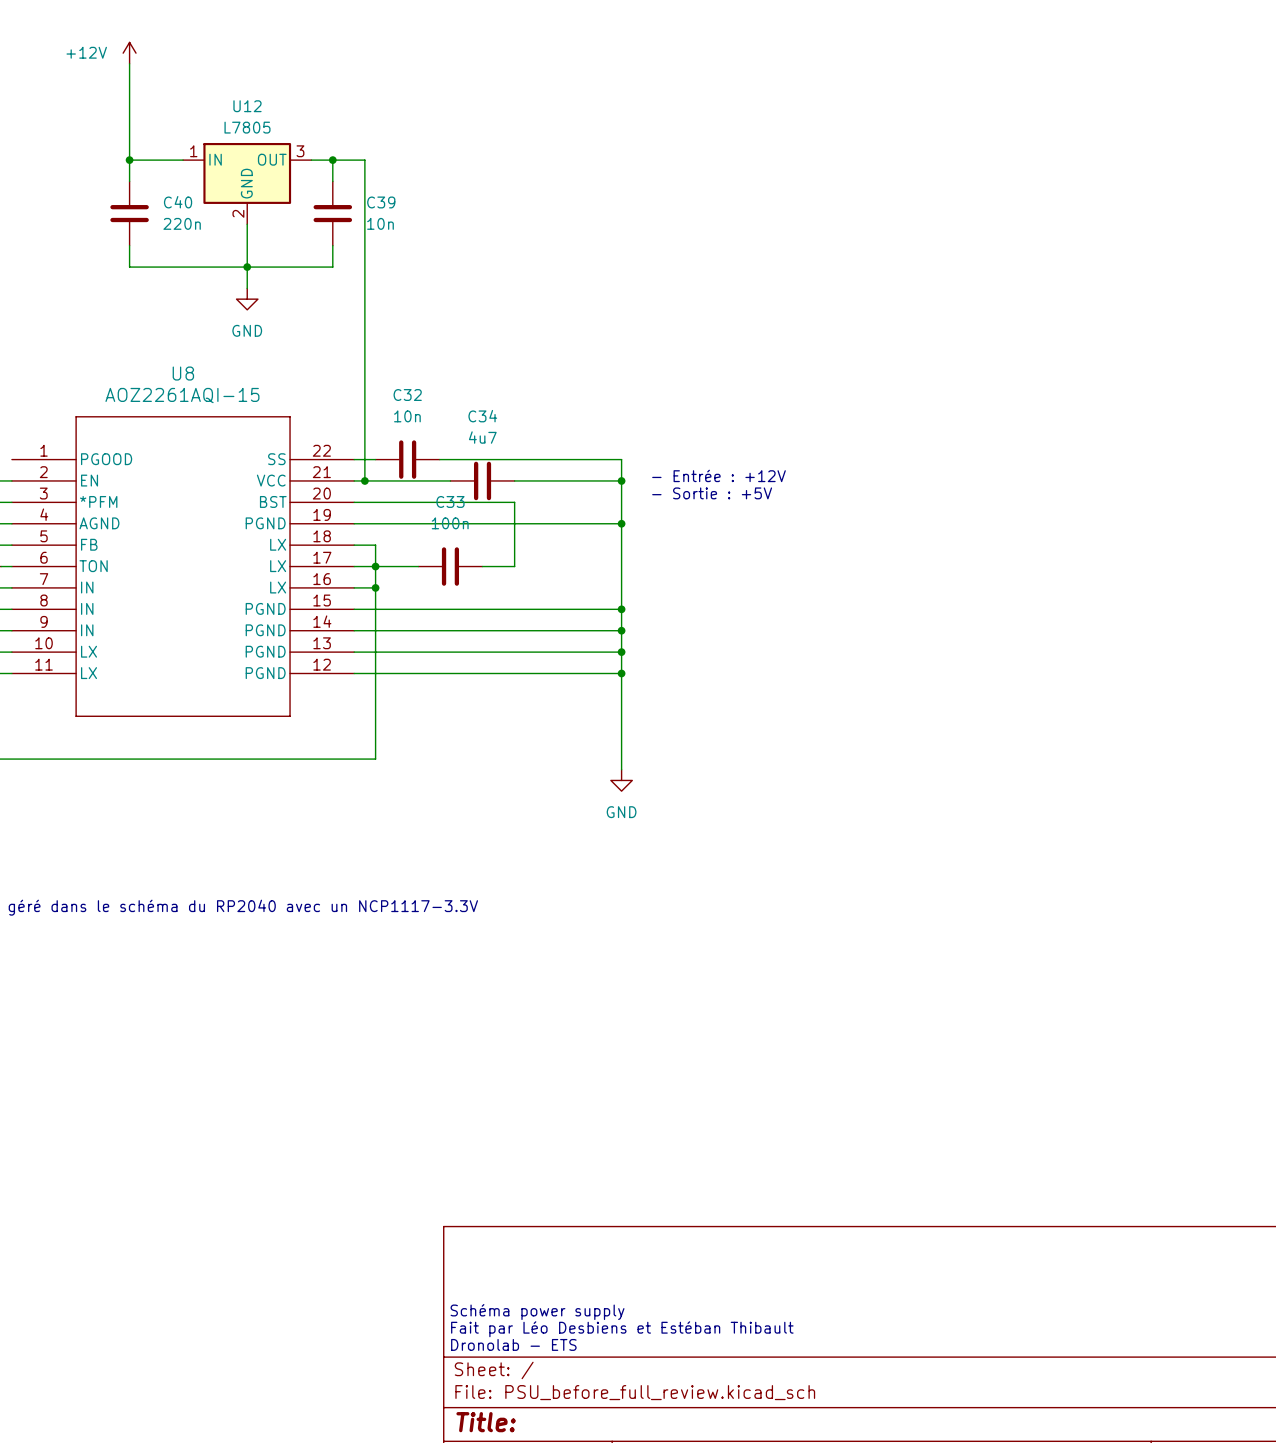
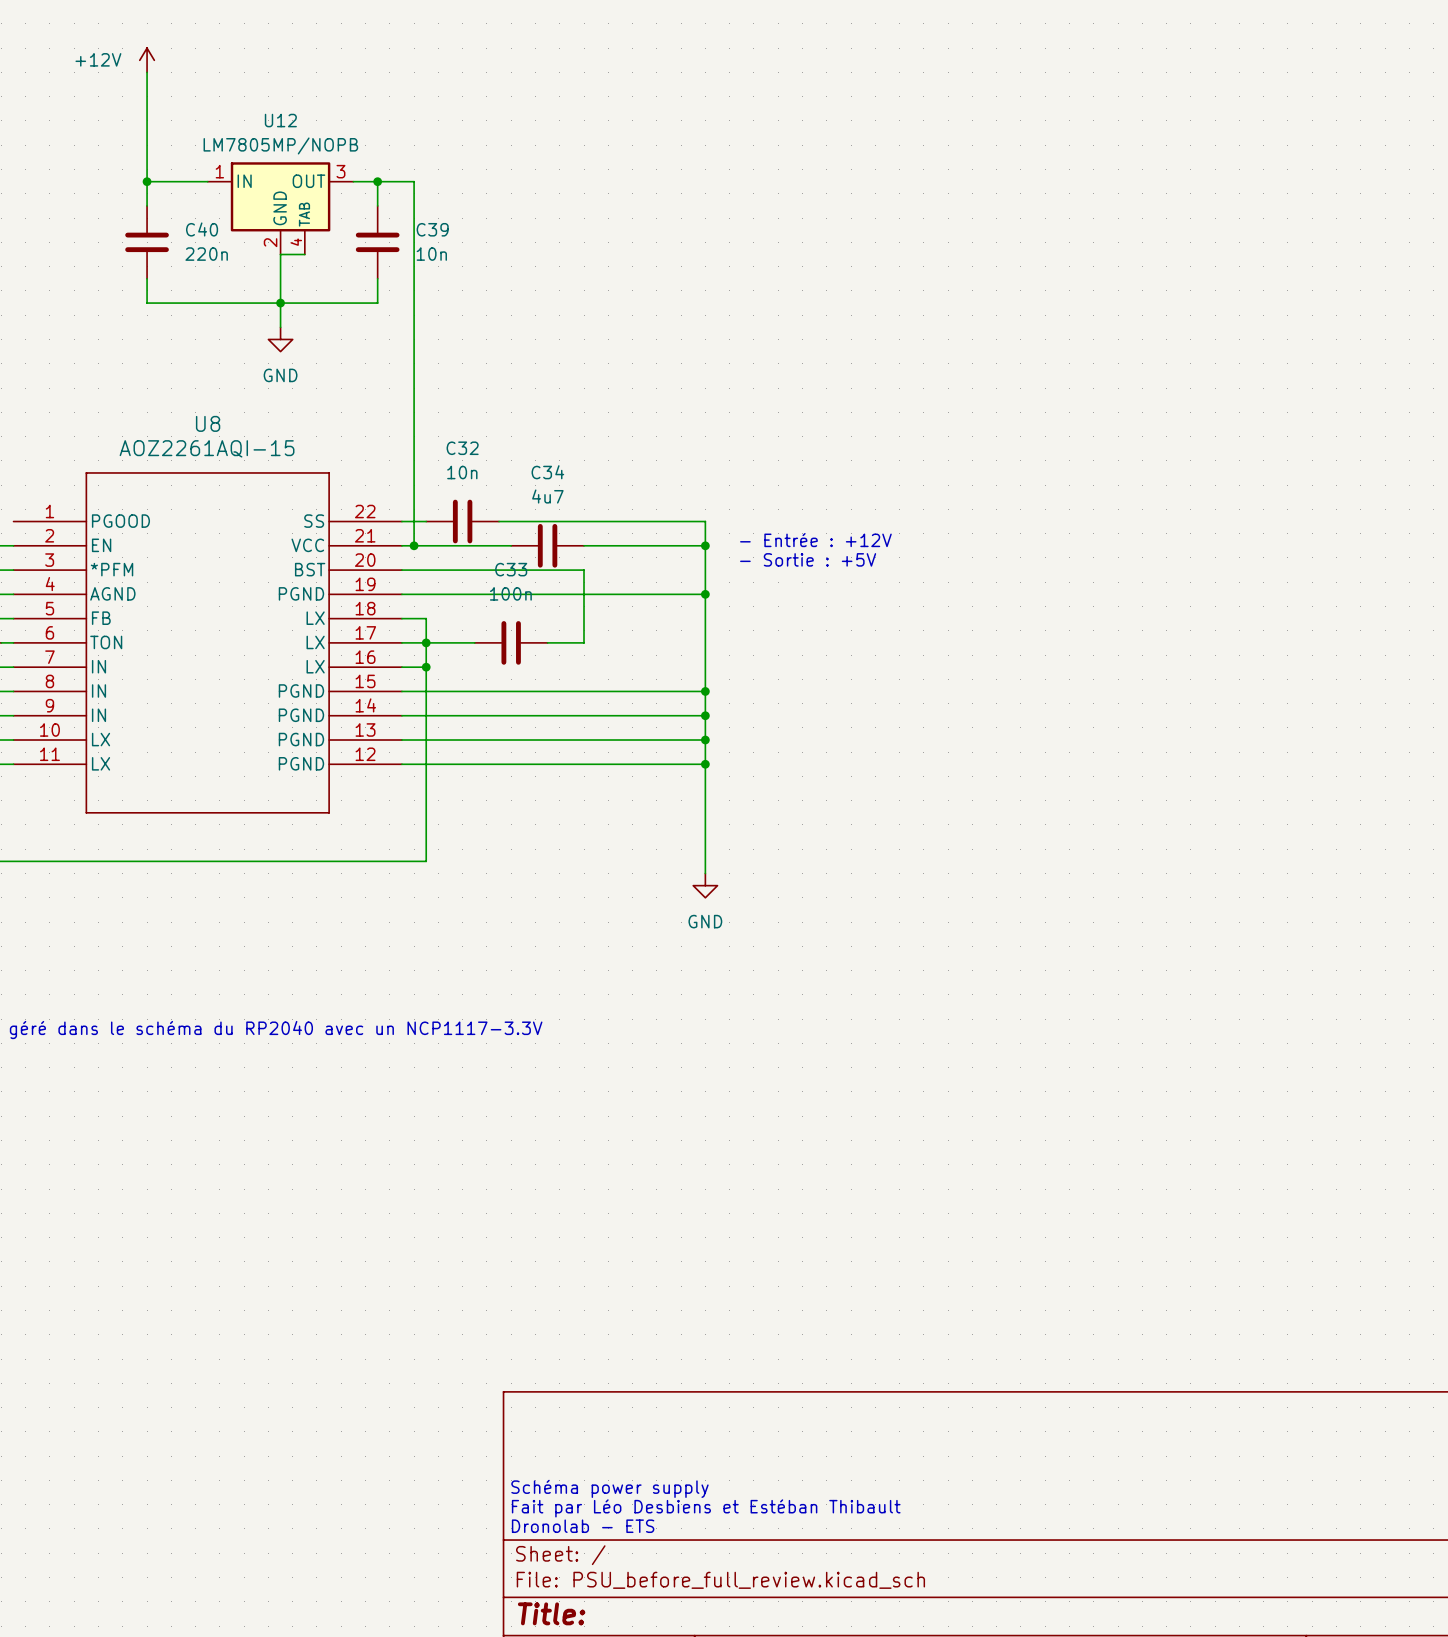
U12 value: L7805 (247, 127) -> LM7805MP/NOPB (280, 145)
U12 symbol: [183, 142, 312, 225] -> [207, 162, 354, 255]
wire: none -> (280, 254) (304, 254)

